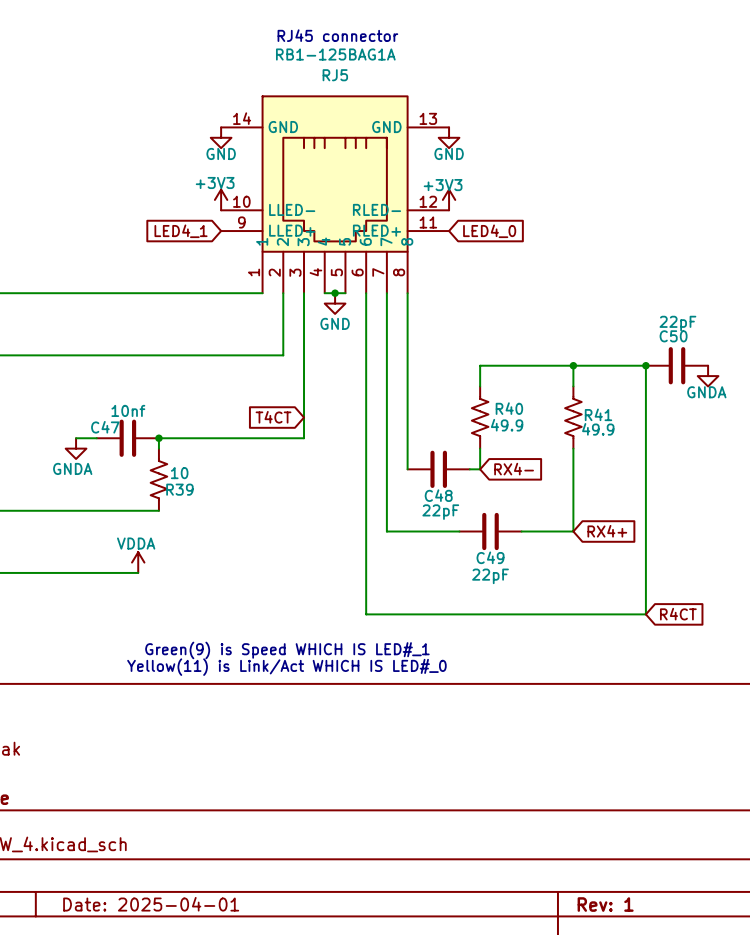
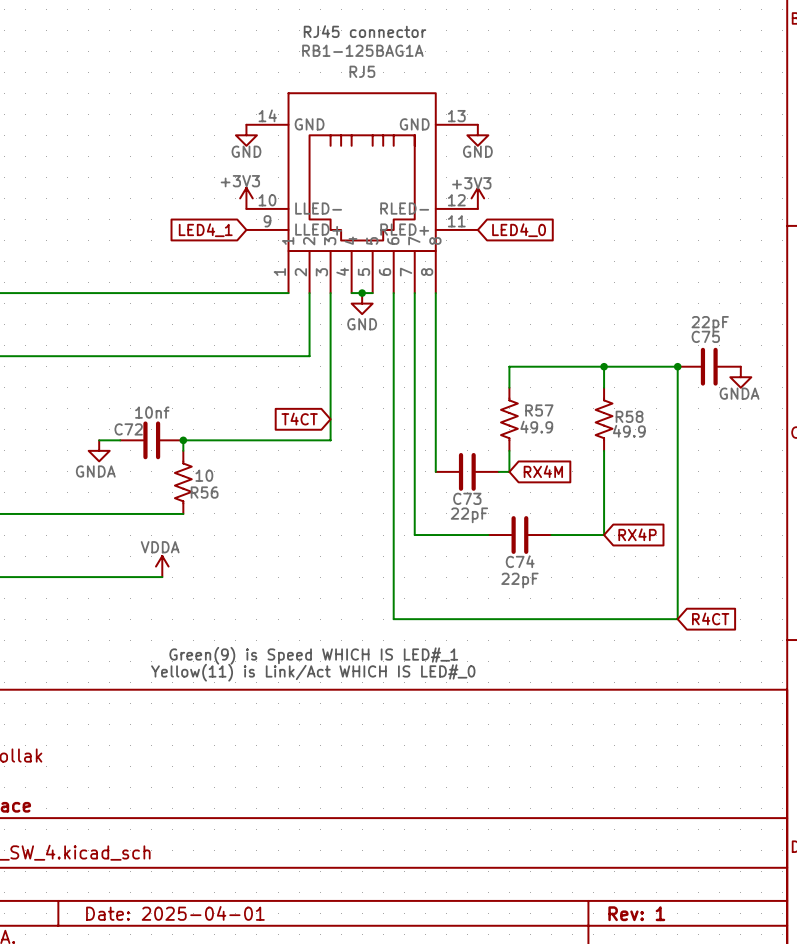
C50 name: C50 (673, 336) -> C75 (705, 336)
R40 name: R40 (509, 408) -> R57 (539, 410)
R41 name: R41 (598, 414) -> R58 (629, 416)
C47 name: C47 (105, 427) -> C72 (128, 429)
global label: RX4- (514, 469) -> RX4M (543, 471)
R39 name: R39 (179, 489) -> R56 (204, 492)
C48 name: C48 (438, 495) -> C73 (467, 498)
global label: RX4+ (607, 531) -> RX4P (637, 534)
C49 name: C49 (490, 557) -> C74 (520, 561)

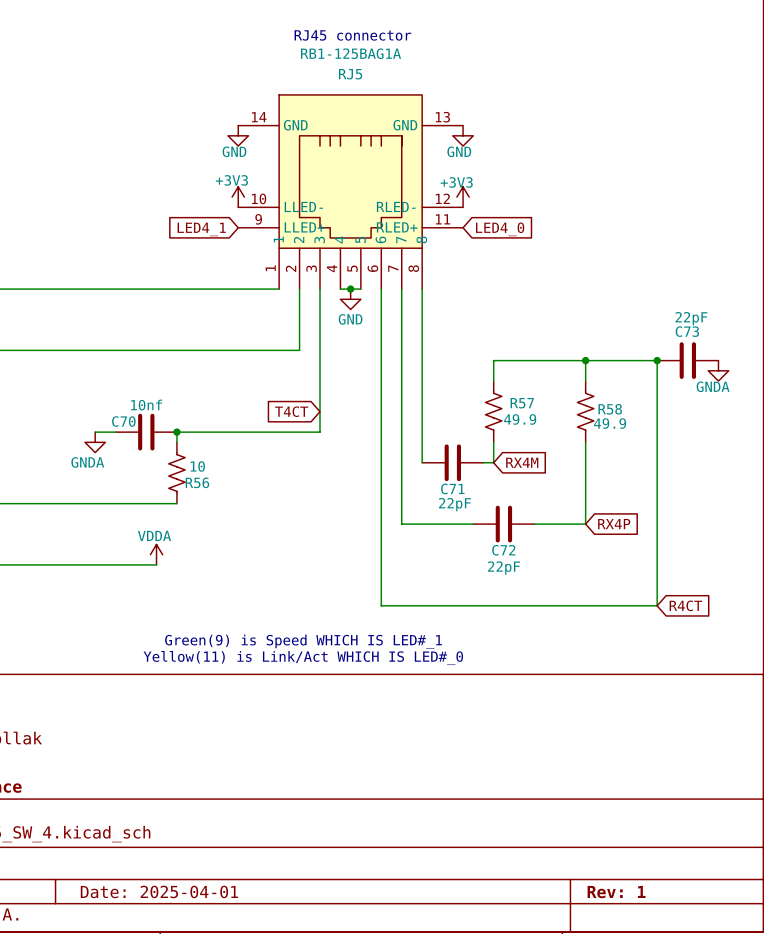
C75 name: C75 (705, 336) -> C73 (687, 331)
C72 name: C72 (128, 429) -> C70 (123, 421)
C73 name: C73 (467, 498) -> C71 (452, 488)
C74 name: C74 (520, 561) -> C72 (503, 550)

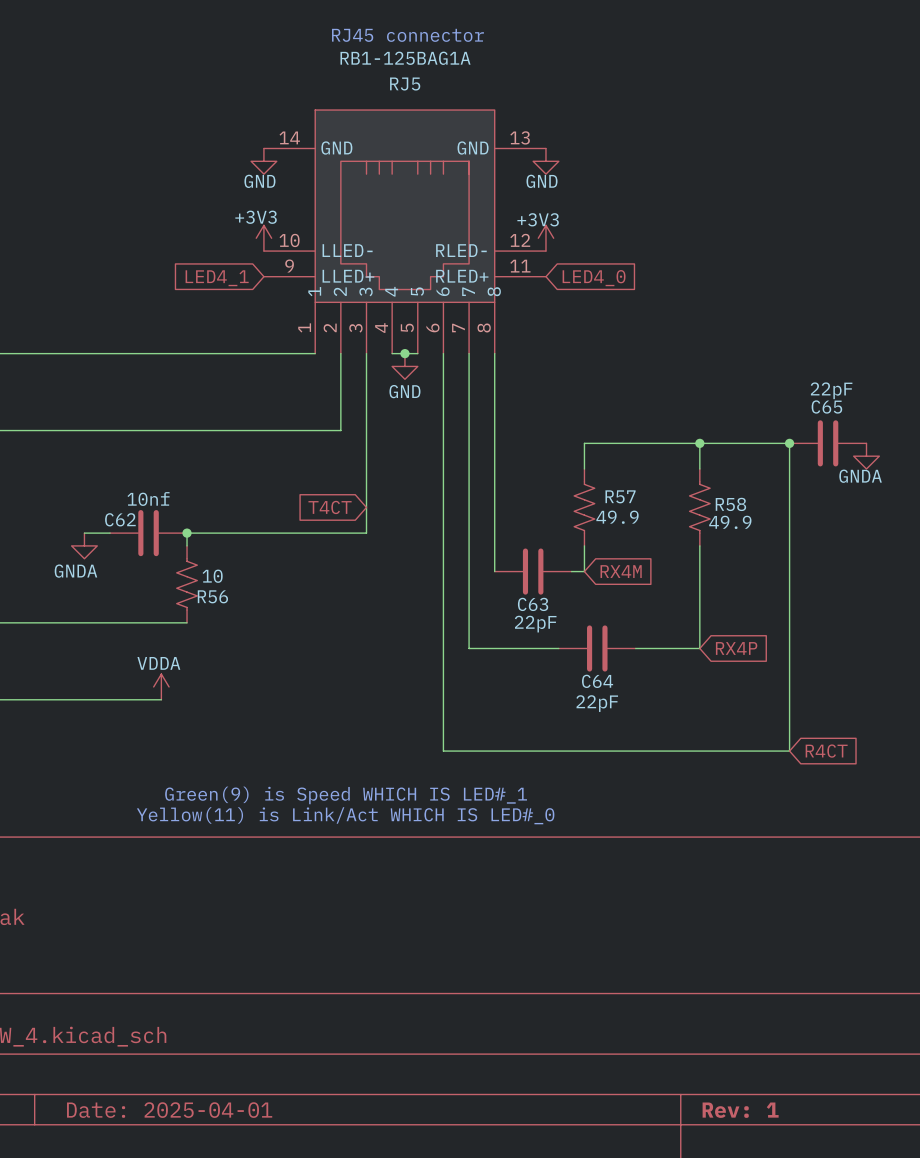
C73 name: C73 (687, 331) -> C65 (826, 406)
C70 name: C70 (123, 421) -> C62 (120, 519)
C71 name: C71 (452, 488) -> C63 (533, 604)
C72 name: C72 (503, 550) -> C64 (597, 681)

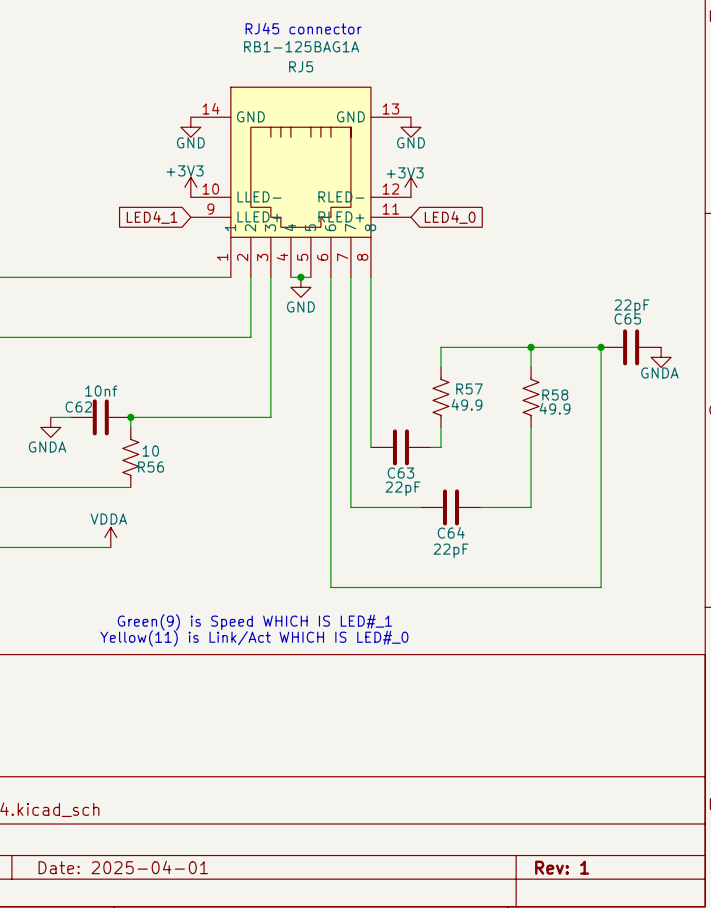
global label: T4CT (330, 507) -> none
global label: RX4M (621, 571) -> none
global label: RX4P (736, 648) -> none
global label: R4CT (826, 751) -> none

